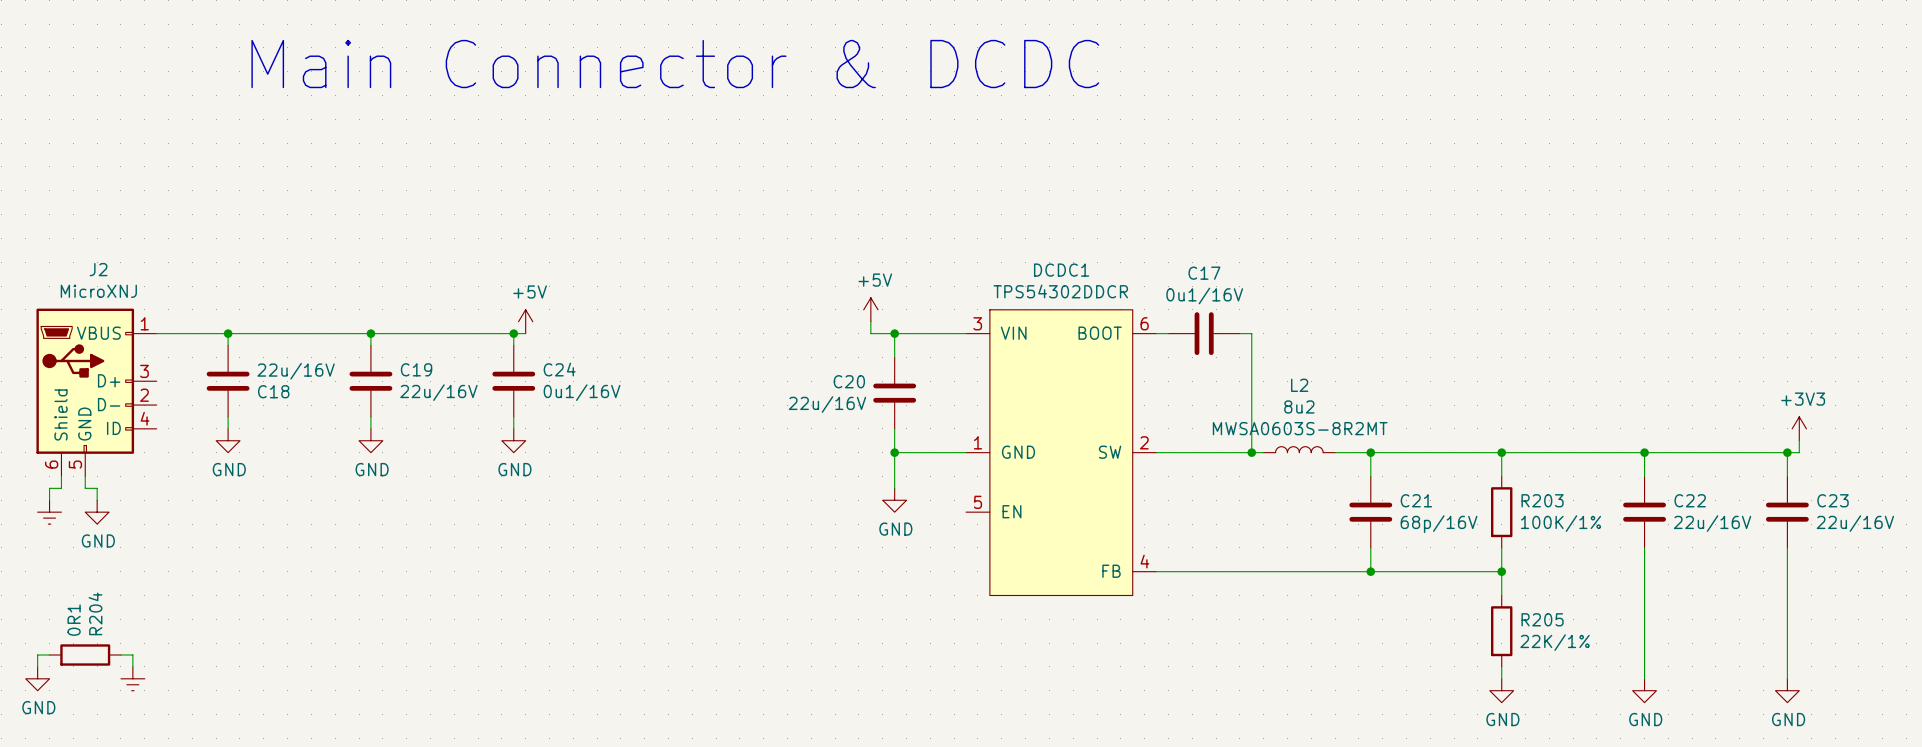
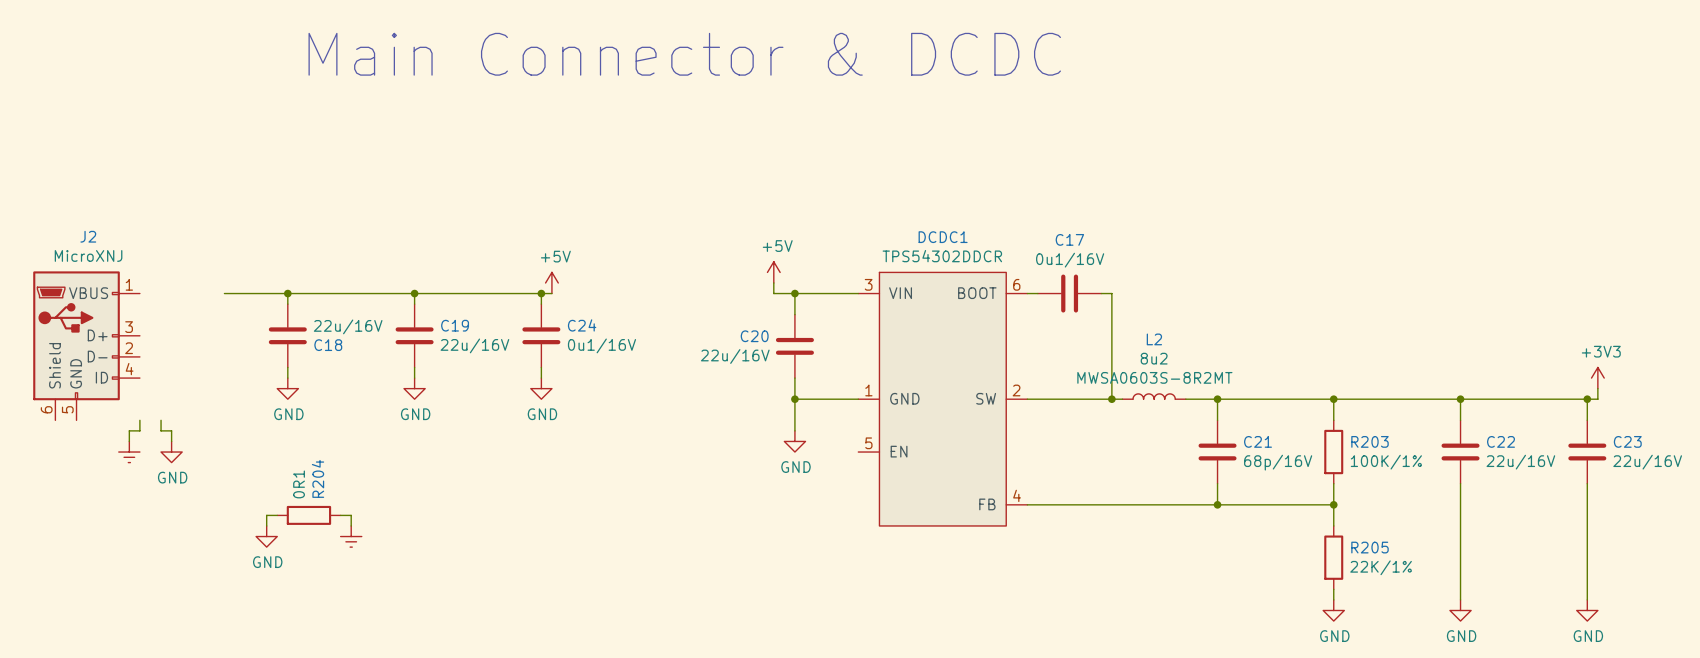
text position: Main Connector & DCDC (675, 64) -> Main Connector & DCDC (684, 54)
power symbol position: +5V (525, 321) -> +5V (551, 282)
wire: (156, 333) (251, 333) -> none
wire: (228, 333) (228, 345) -> (287, 293) (287, 304)
junction: (228, 333) -> none
junction: none -> (287, 293)
wire: (370, 333) (370, 345) -> (414, 293) (414, 304)
junction: (370, 333) -> none
junction: none -> (414, 293)
wire: (513, 333) (513, 345) -> (541, 293) (541, 304)
junction: (513, 333) -> none
wire: none -> (467, 293) (551, 293)
junction: none -> (541, 293)
C18 position: (228, 381) -> (287, 335)
C19 position: (370, 381) -> (414, 335)
C24 position: (513, 381) -> (541, 335)
wire: (228, 416) (228, 428) -> (287, 367) (287, 378)
wire: (370, 416) (370, 428) -> (414, 367) (414, 378)
wire: (513, 416) (513, 428) -> (541, 367) (541, 378)
power symbol: GND (228, 440) -> none
power symbol: none -> GND (287, 388)
power symbol: GND (370, 440) -> none
power symbol: none -> GND (414, 388)
power symbol: GND (513, 440) -> none
power symbol: none -> GND (541, 388)
wire: (61, 476) (61, 488) (49, 488) (49, 500) -> (139, 420) (139, 430) (129, 430) (129, 441)
wire: (85, 476) (85, 488) (97, 488) (97, 500) -> (161, 420) (161, 430) (171, 430) (171, 441)
power symbol: (49, 512) -> none
power symbol: GND (97, 512) -> none
power symbol: none -> (129, 452)
power symbol: none -> GND (171, 452)
wire: none -> (277, 515) (266, 515) (266, 525)
wire: none -> (340, 515) (351, 515) (351, 525)
power symbol: none -> GND (266, 536)
power symbol: none -> (351, 536)
wire: (49, 655) (37, 655) (37, 666) -> none
R204 position: (85, 655) -> (308, 515)
wire: (120, 655) (132, 655) (132, 666) -> none
power symbol: GND (37, 678) -> none
power symbol: (132, 678) -> none

